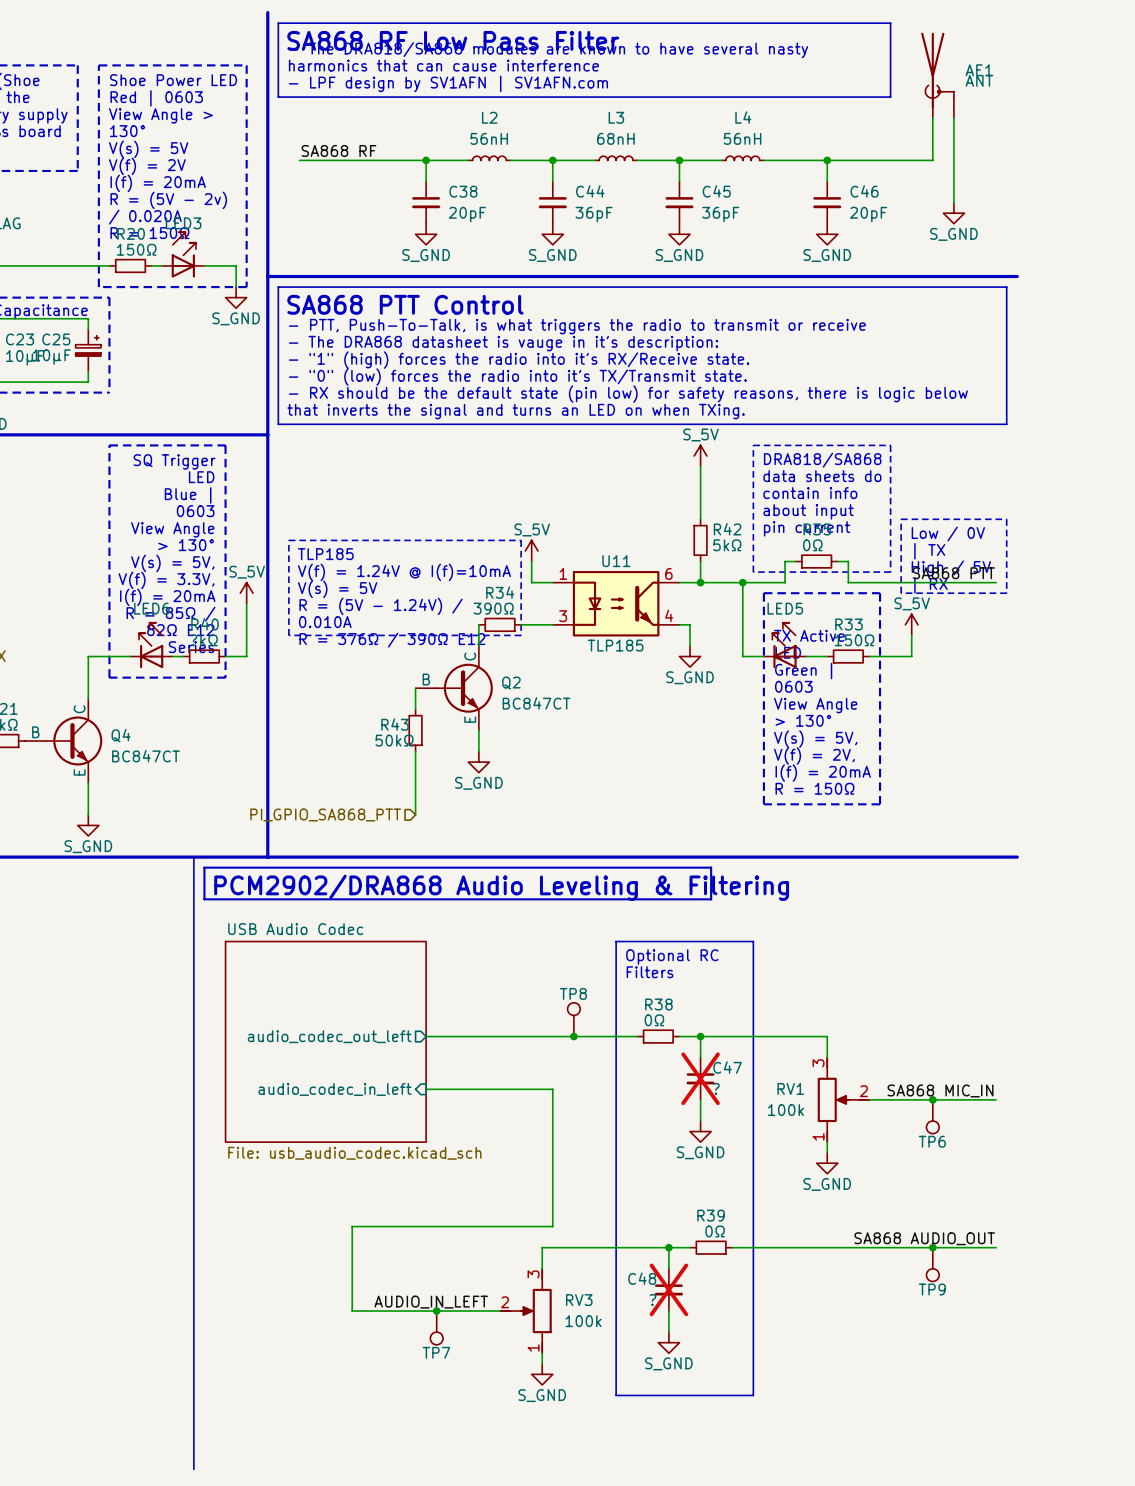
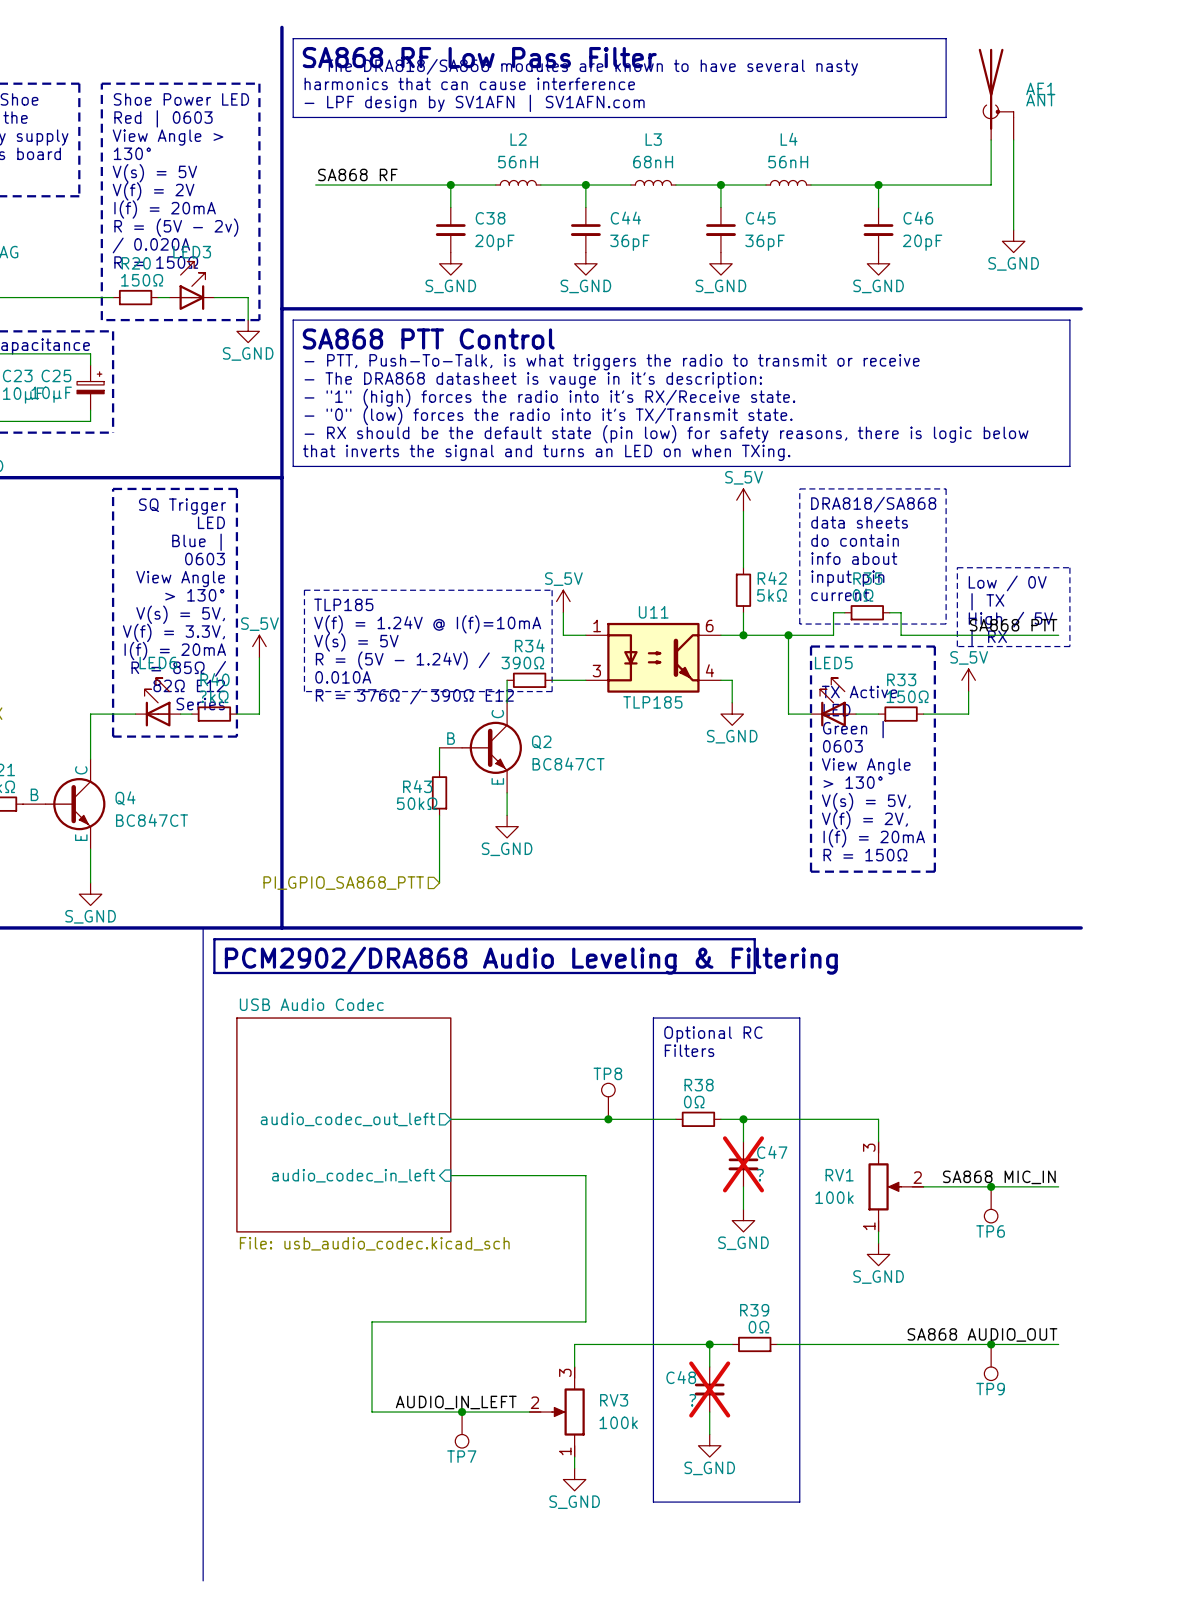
text: data sheets do (822, 476) -> data sheets (859, 522)
text: contain info (810, 493) -> do contain (855, 540)
text: about input (808, 511) -> info about (854, 558)
text: pin current (807, 528) -> input pin (847, 578)
text: none -> current (840, 594)

